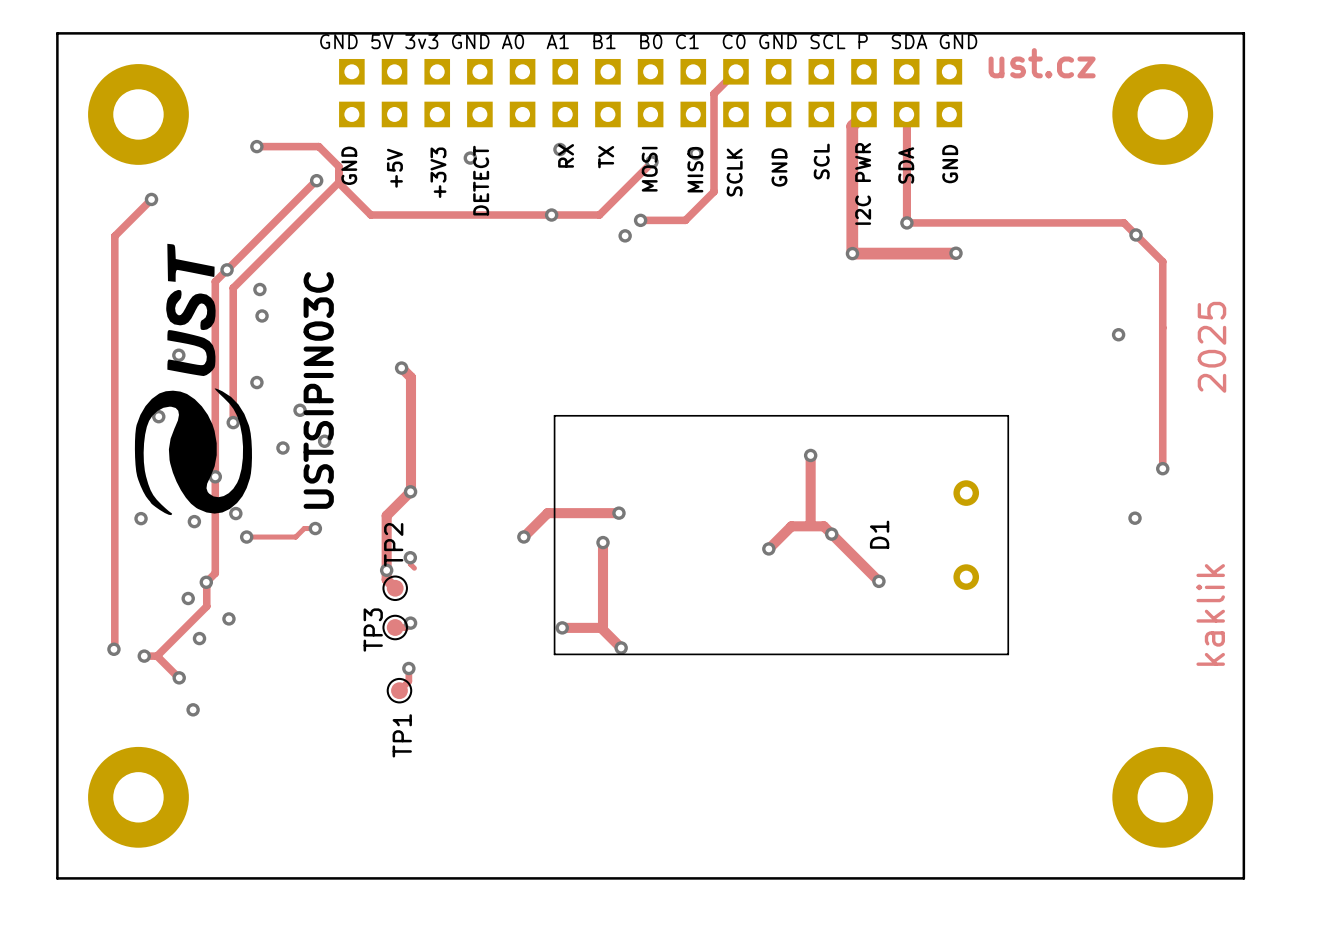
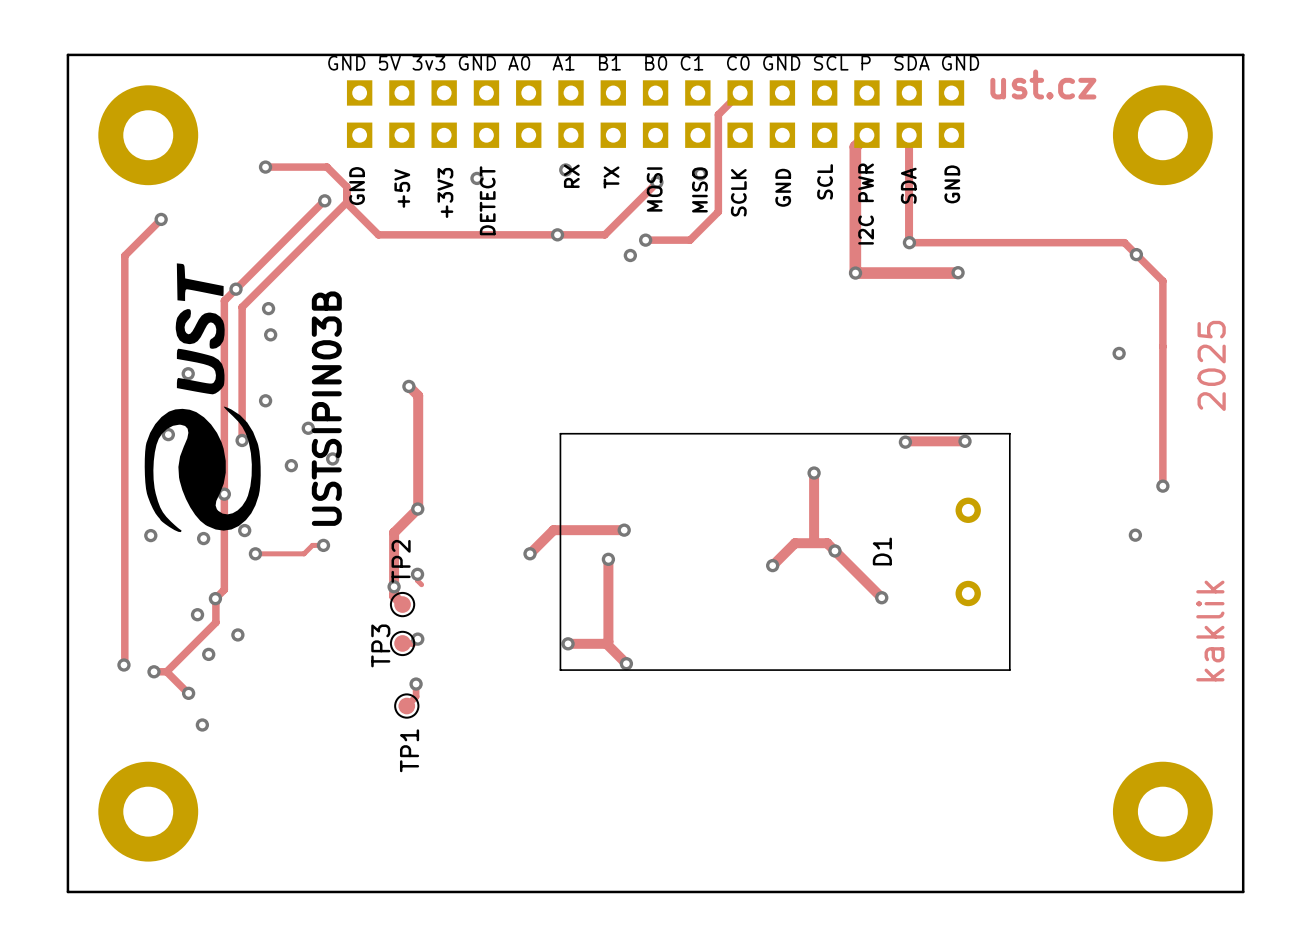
text: USTSIPIN03C (318, 390) -> USTSIPIN03B (326, 408)
track: none -> (965, 441) (905, 442)
via: none -> (965, 441)
via: none -> (905, 442)

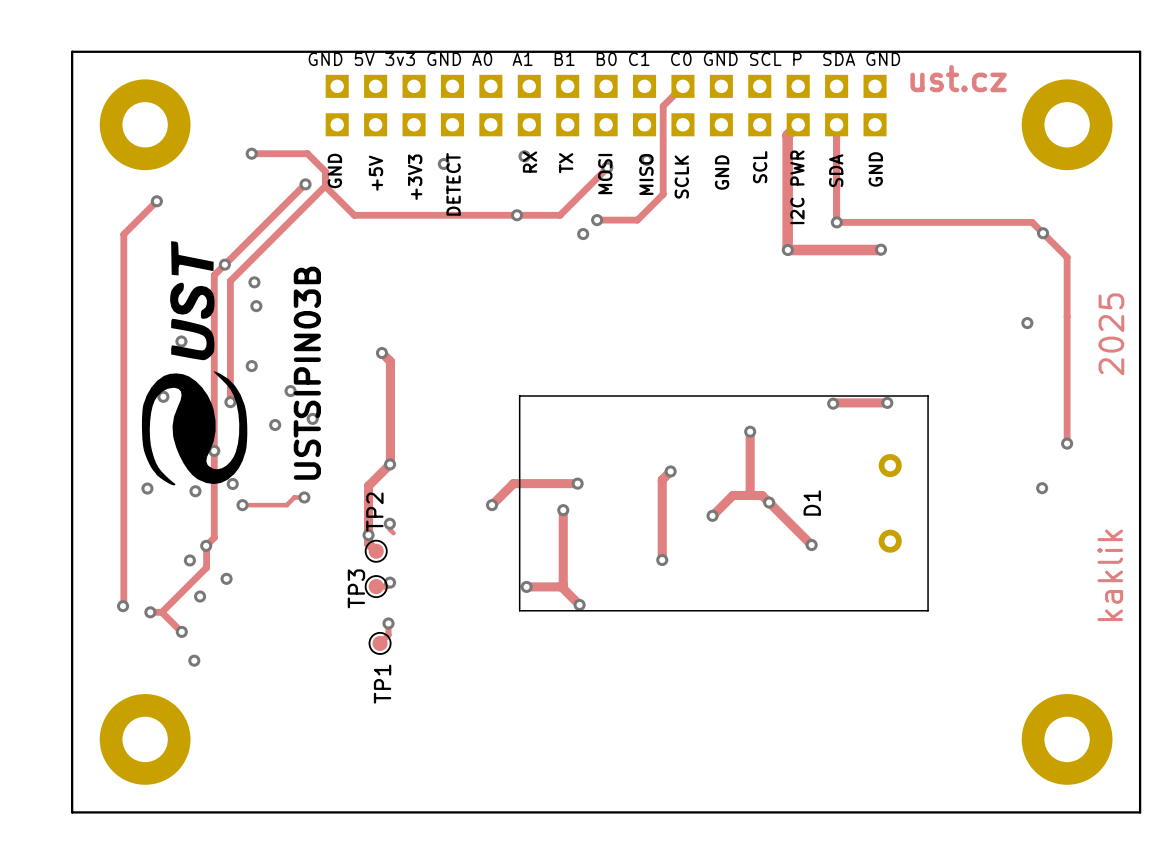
track: none -> (670, 471) (662, 479) (662, 560)
via: none -> (670, 471)
via: none -> (662, 560)

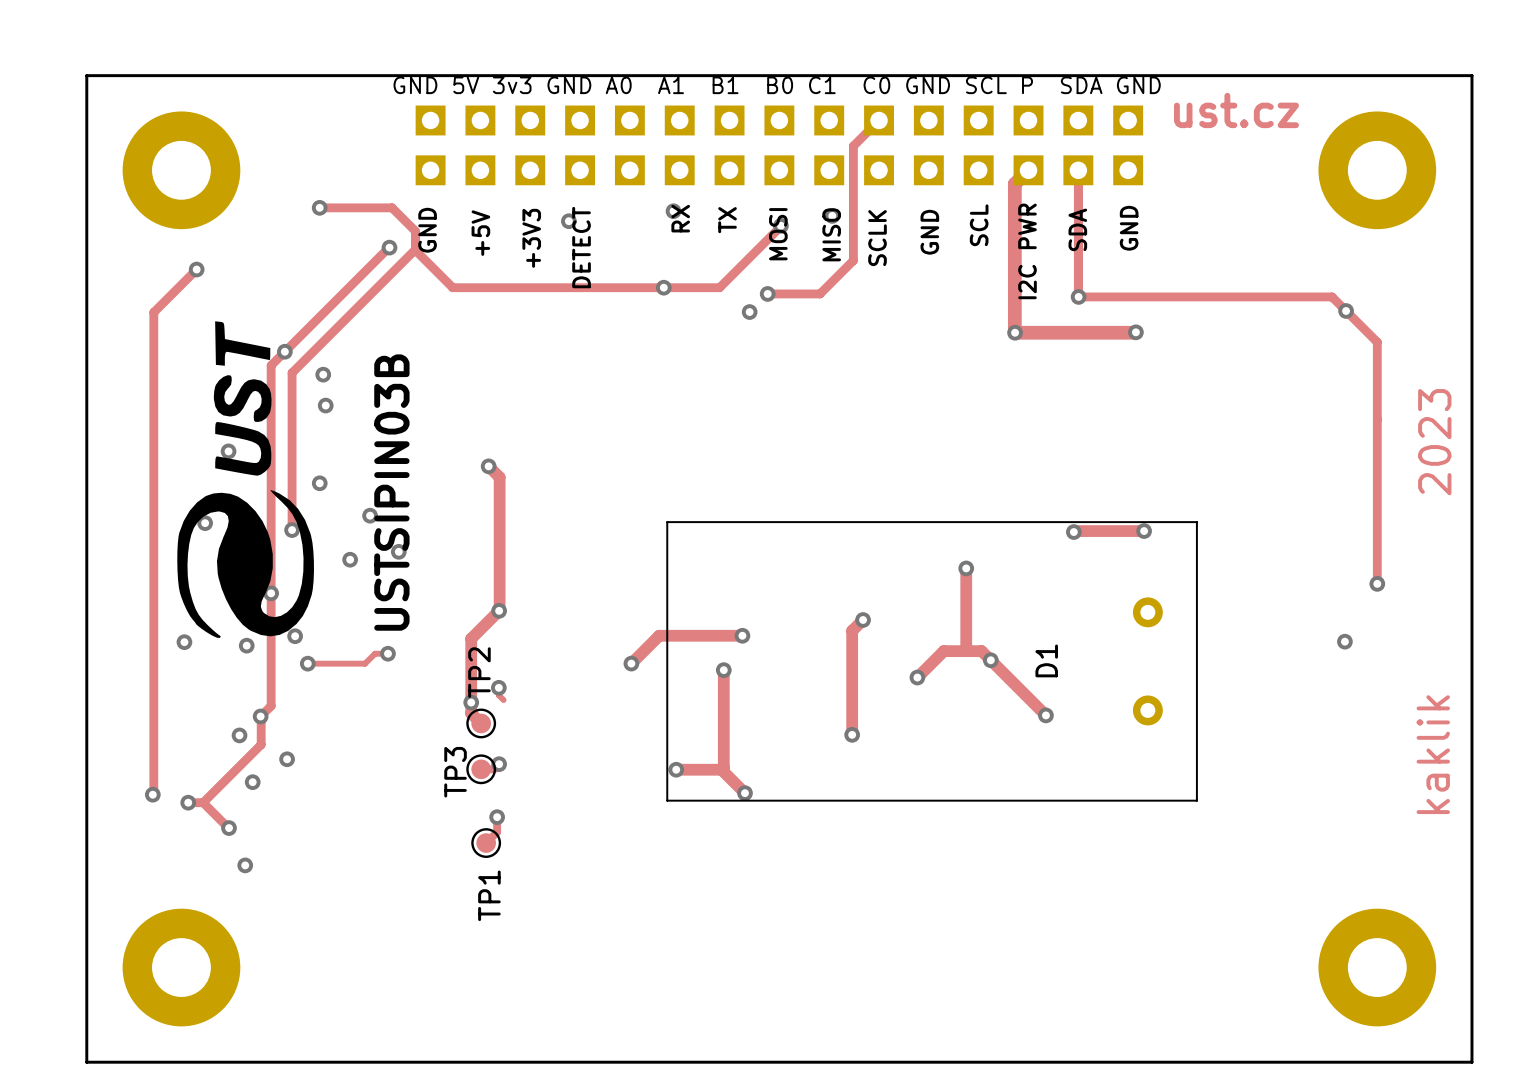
via: (1027, 323) -> none
text: 2025 (1111, 334) -> 2023 (1434, 442)

